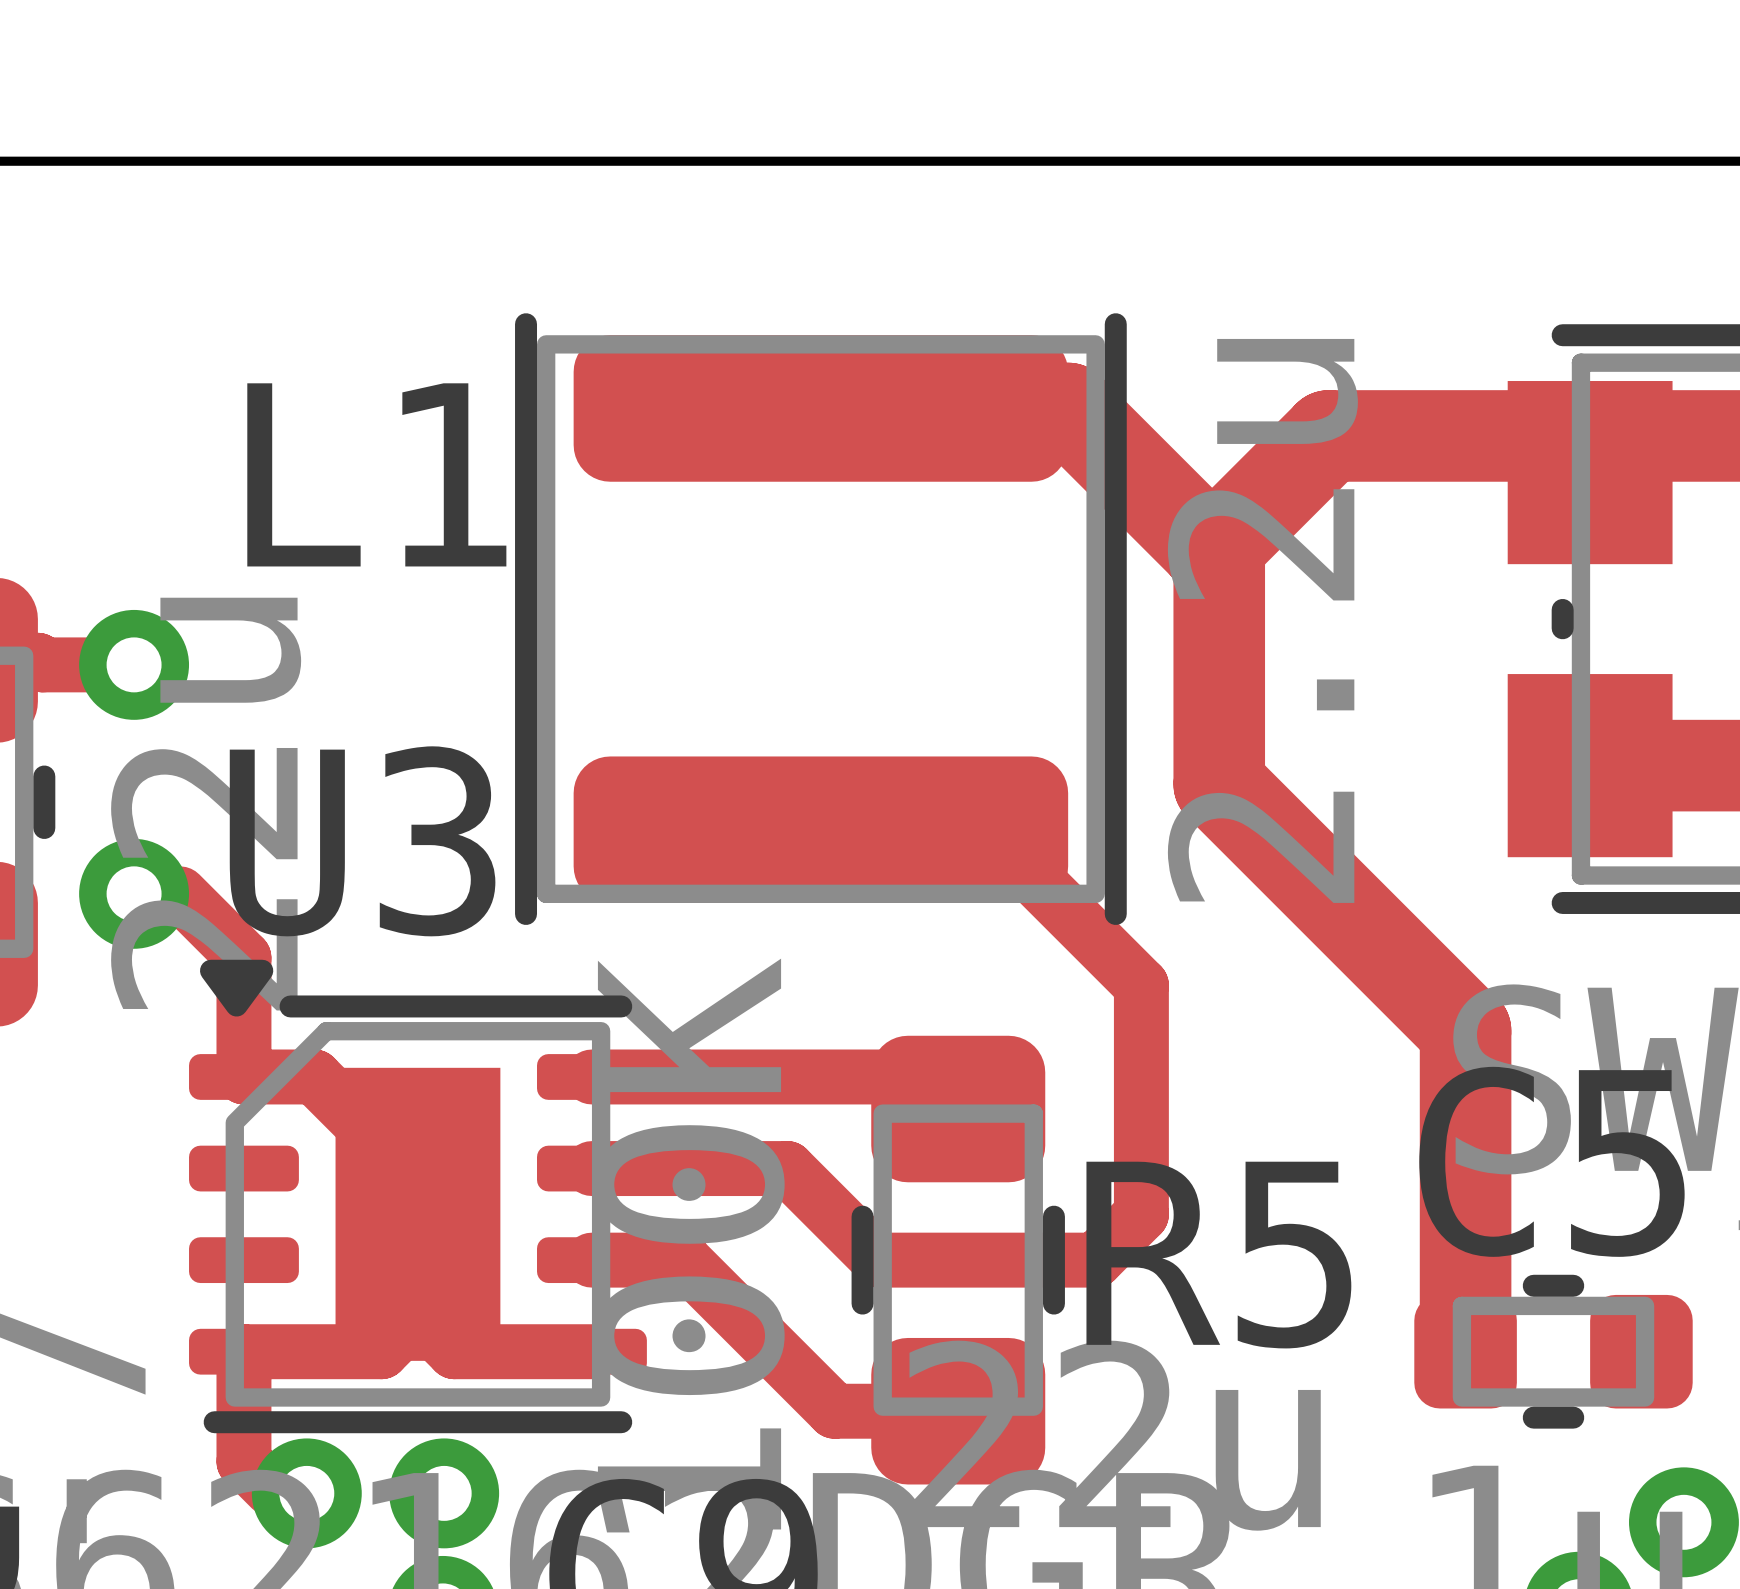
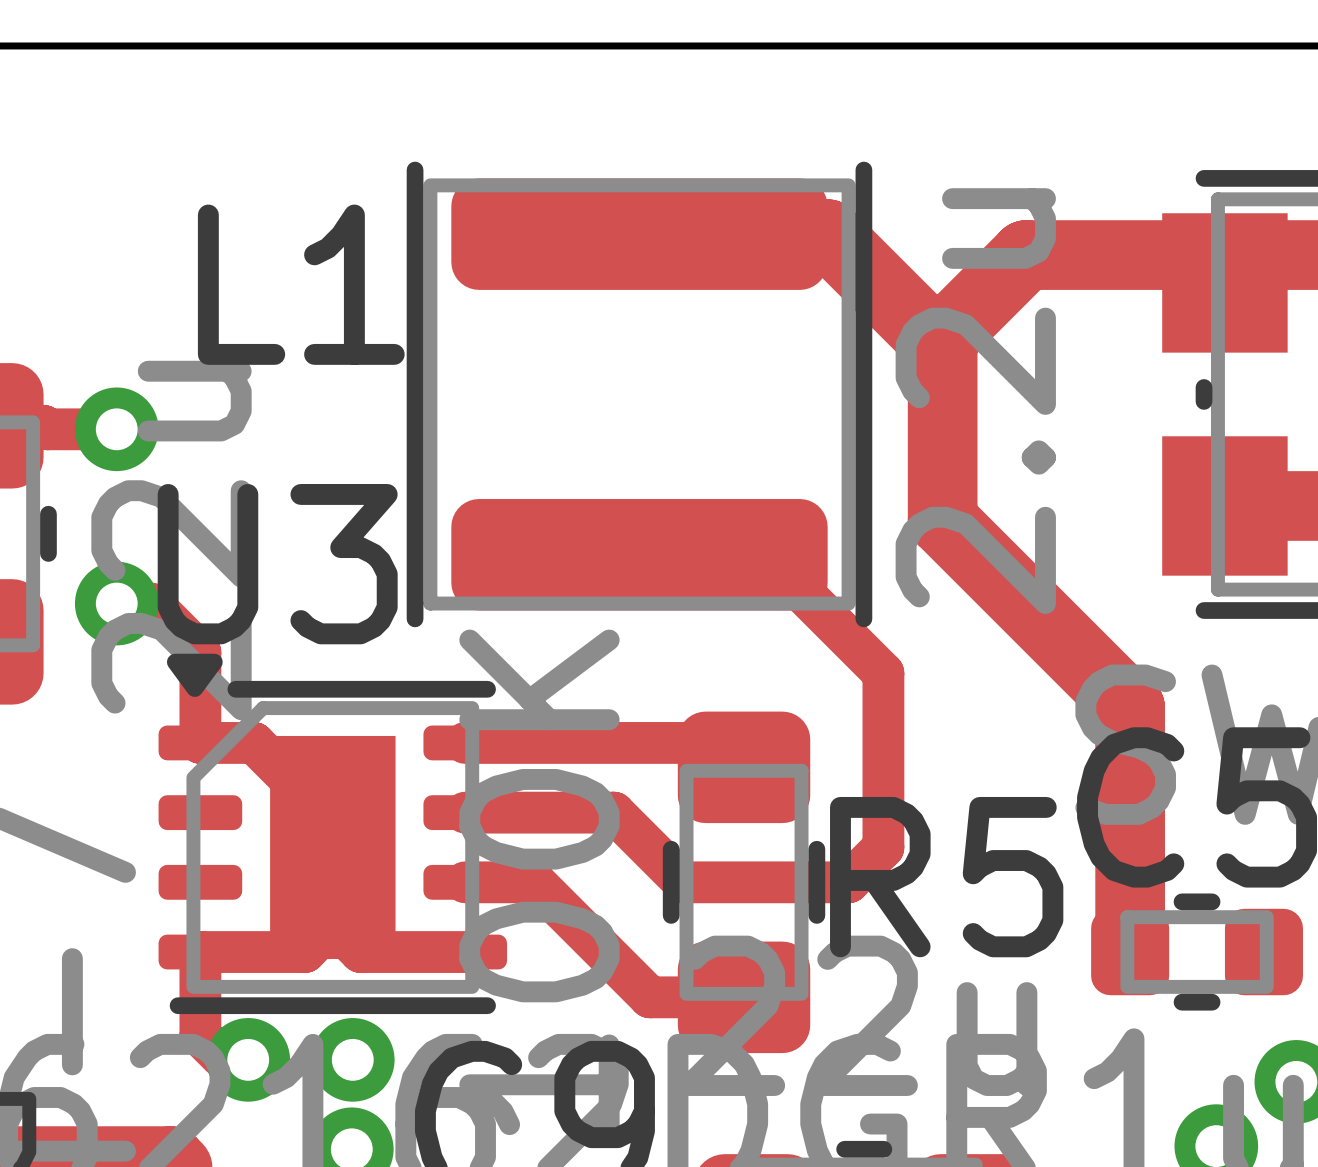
U3 name position: U3 (362, 841) -> U3 (277, 564)

